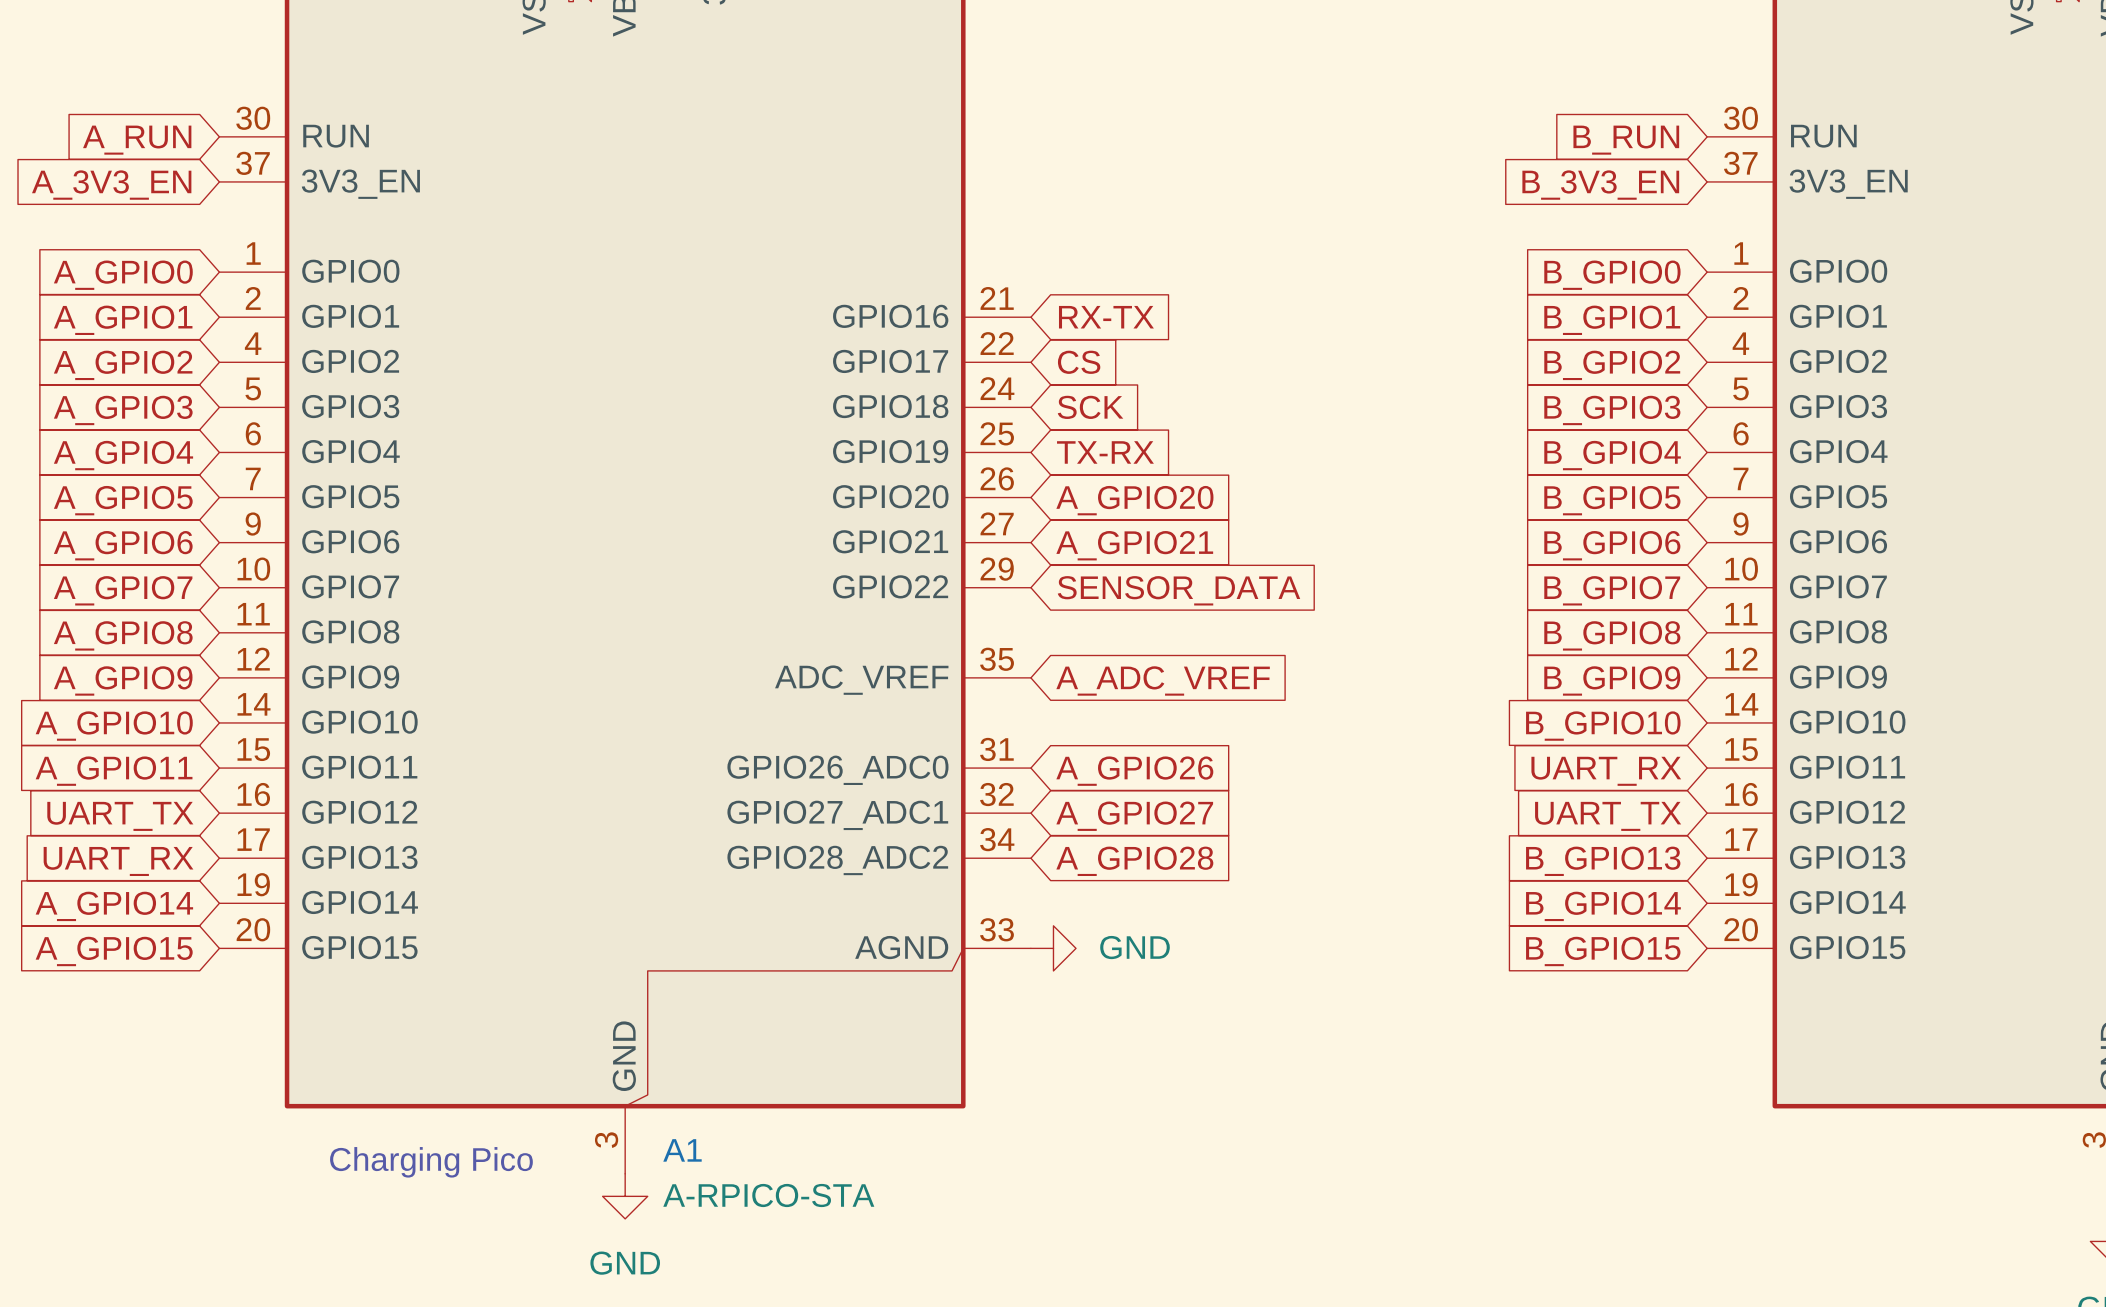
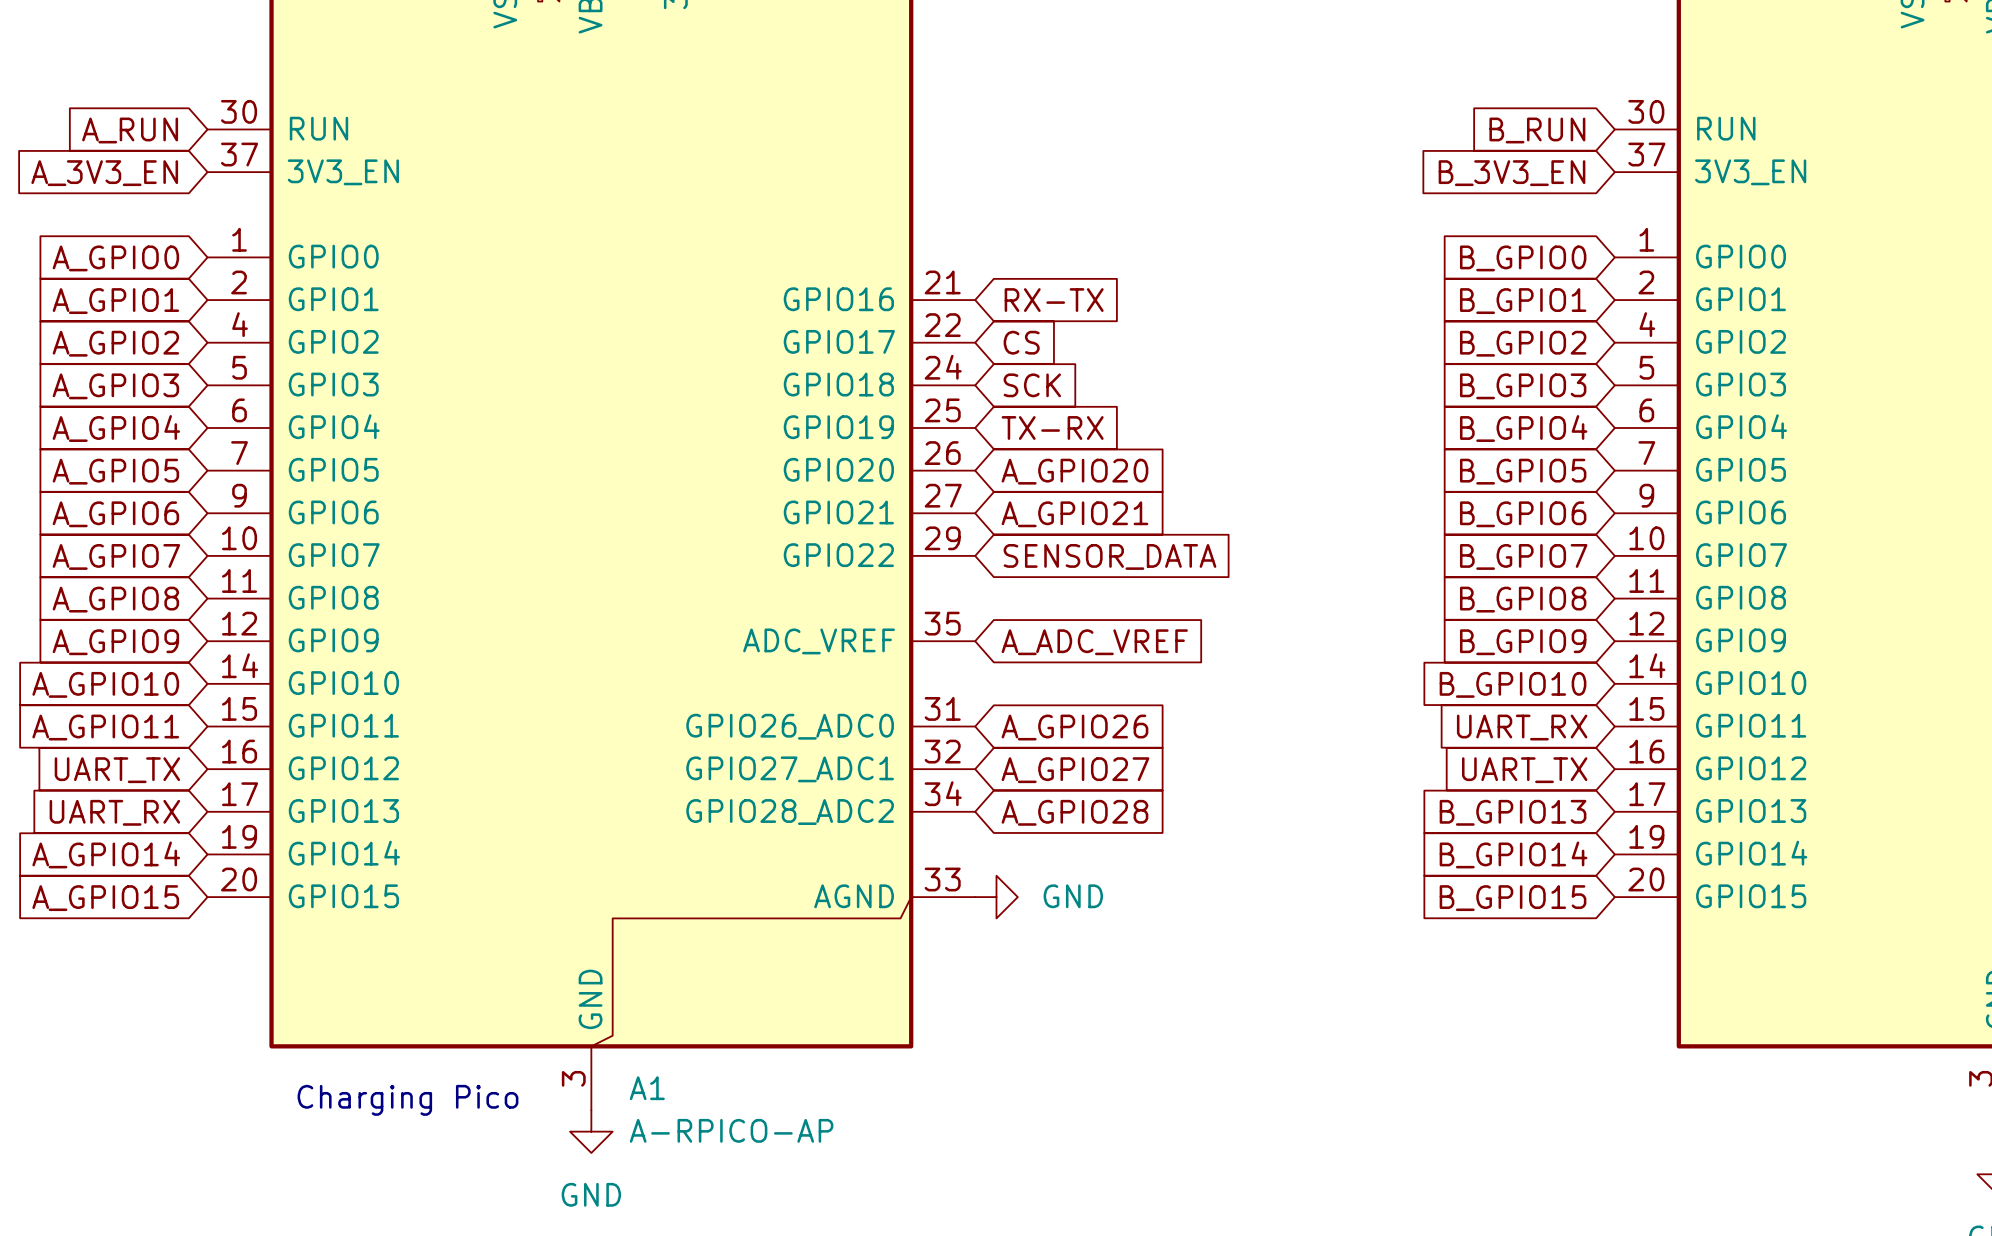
A1 value: A-RPICO-STA (768, 1195) -> A-RPICO-AP (731, 1130)

